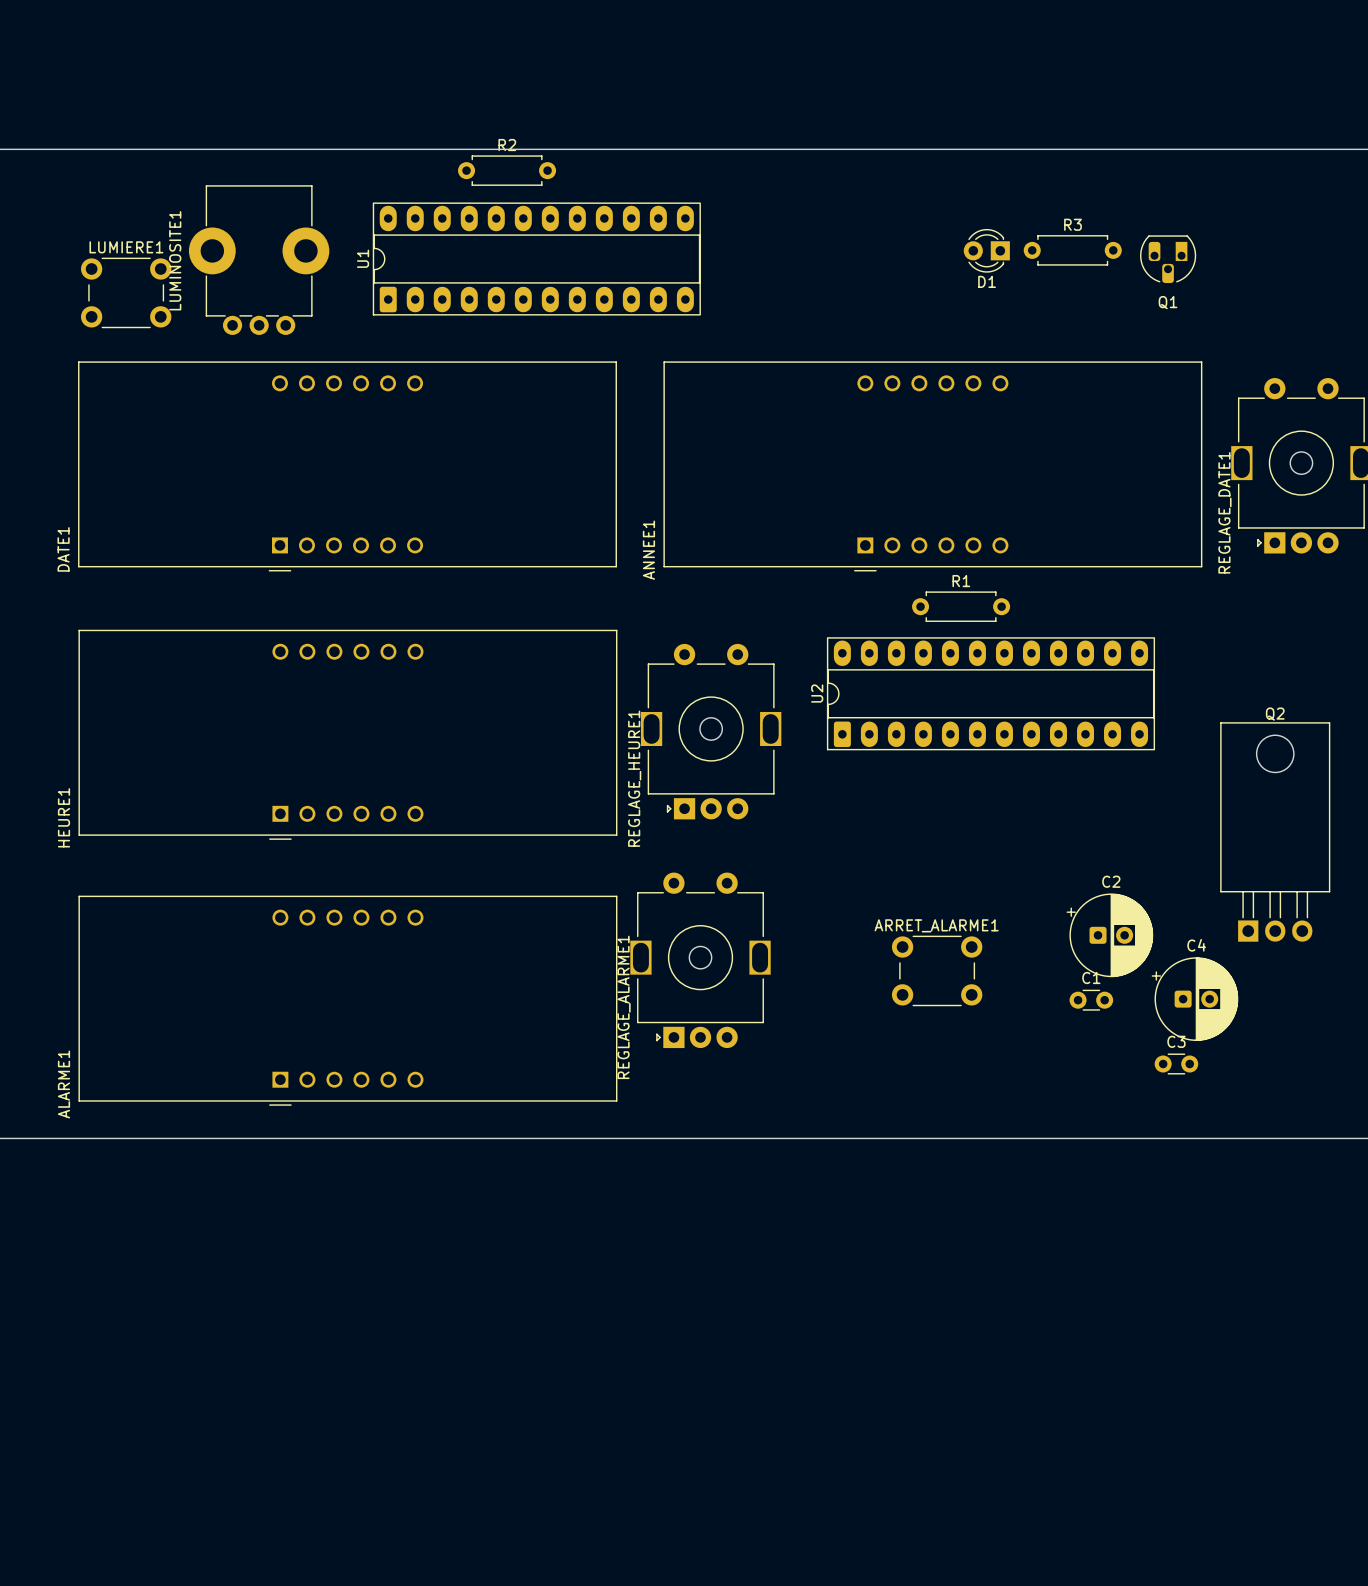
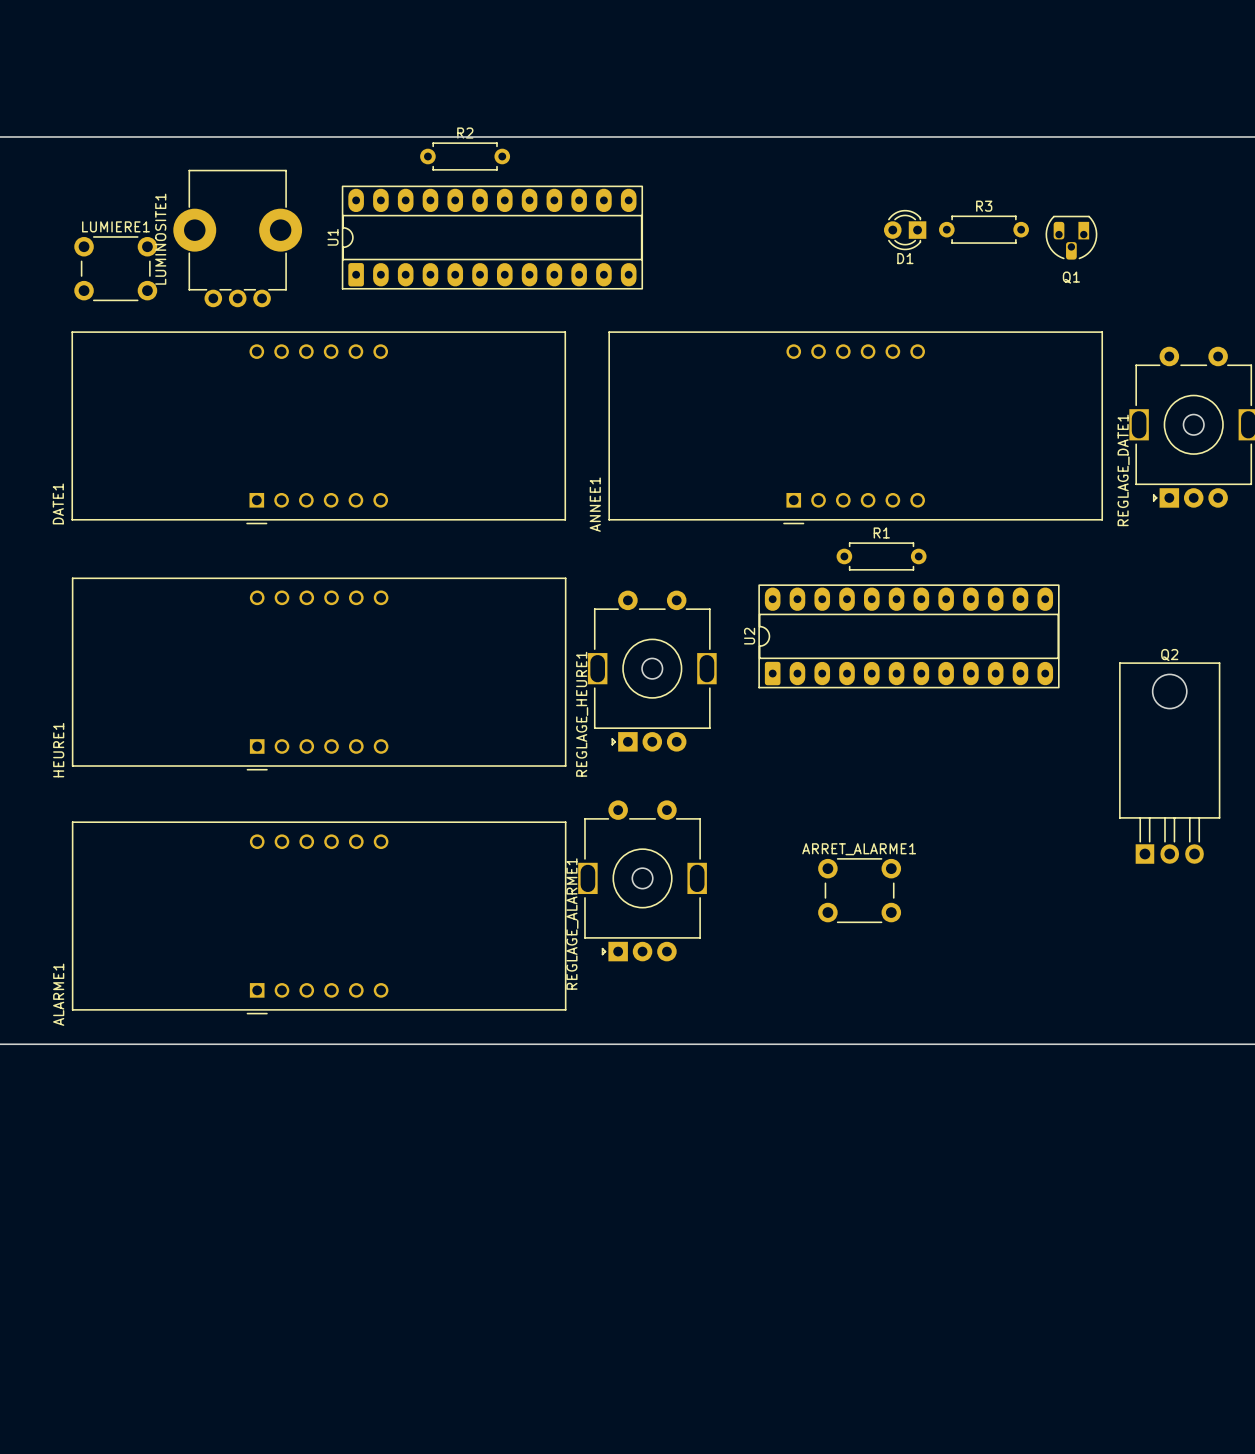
C2: (1109, 935) -> none
C4: (1194, 999) -> none
C1: (1091, 1000) -> none
C3: (1176, 1064) -> none

